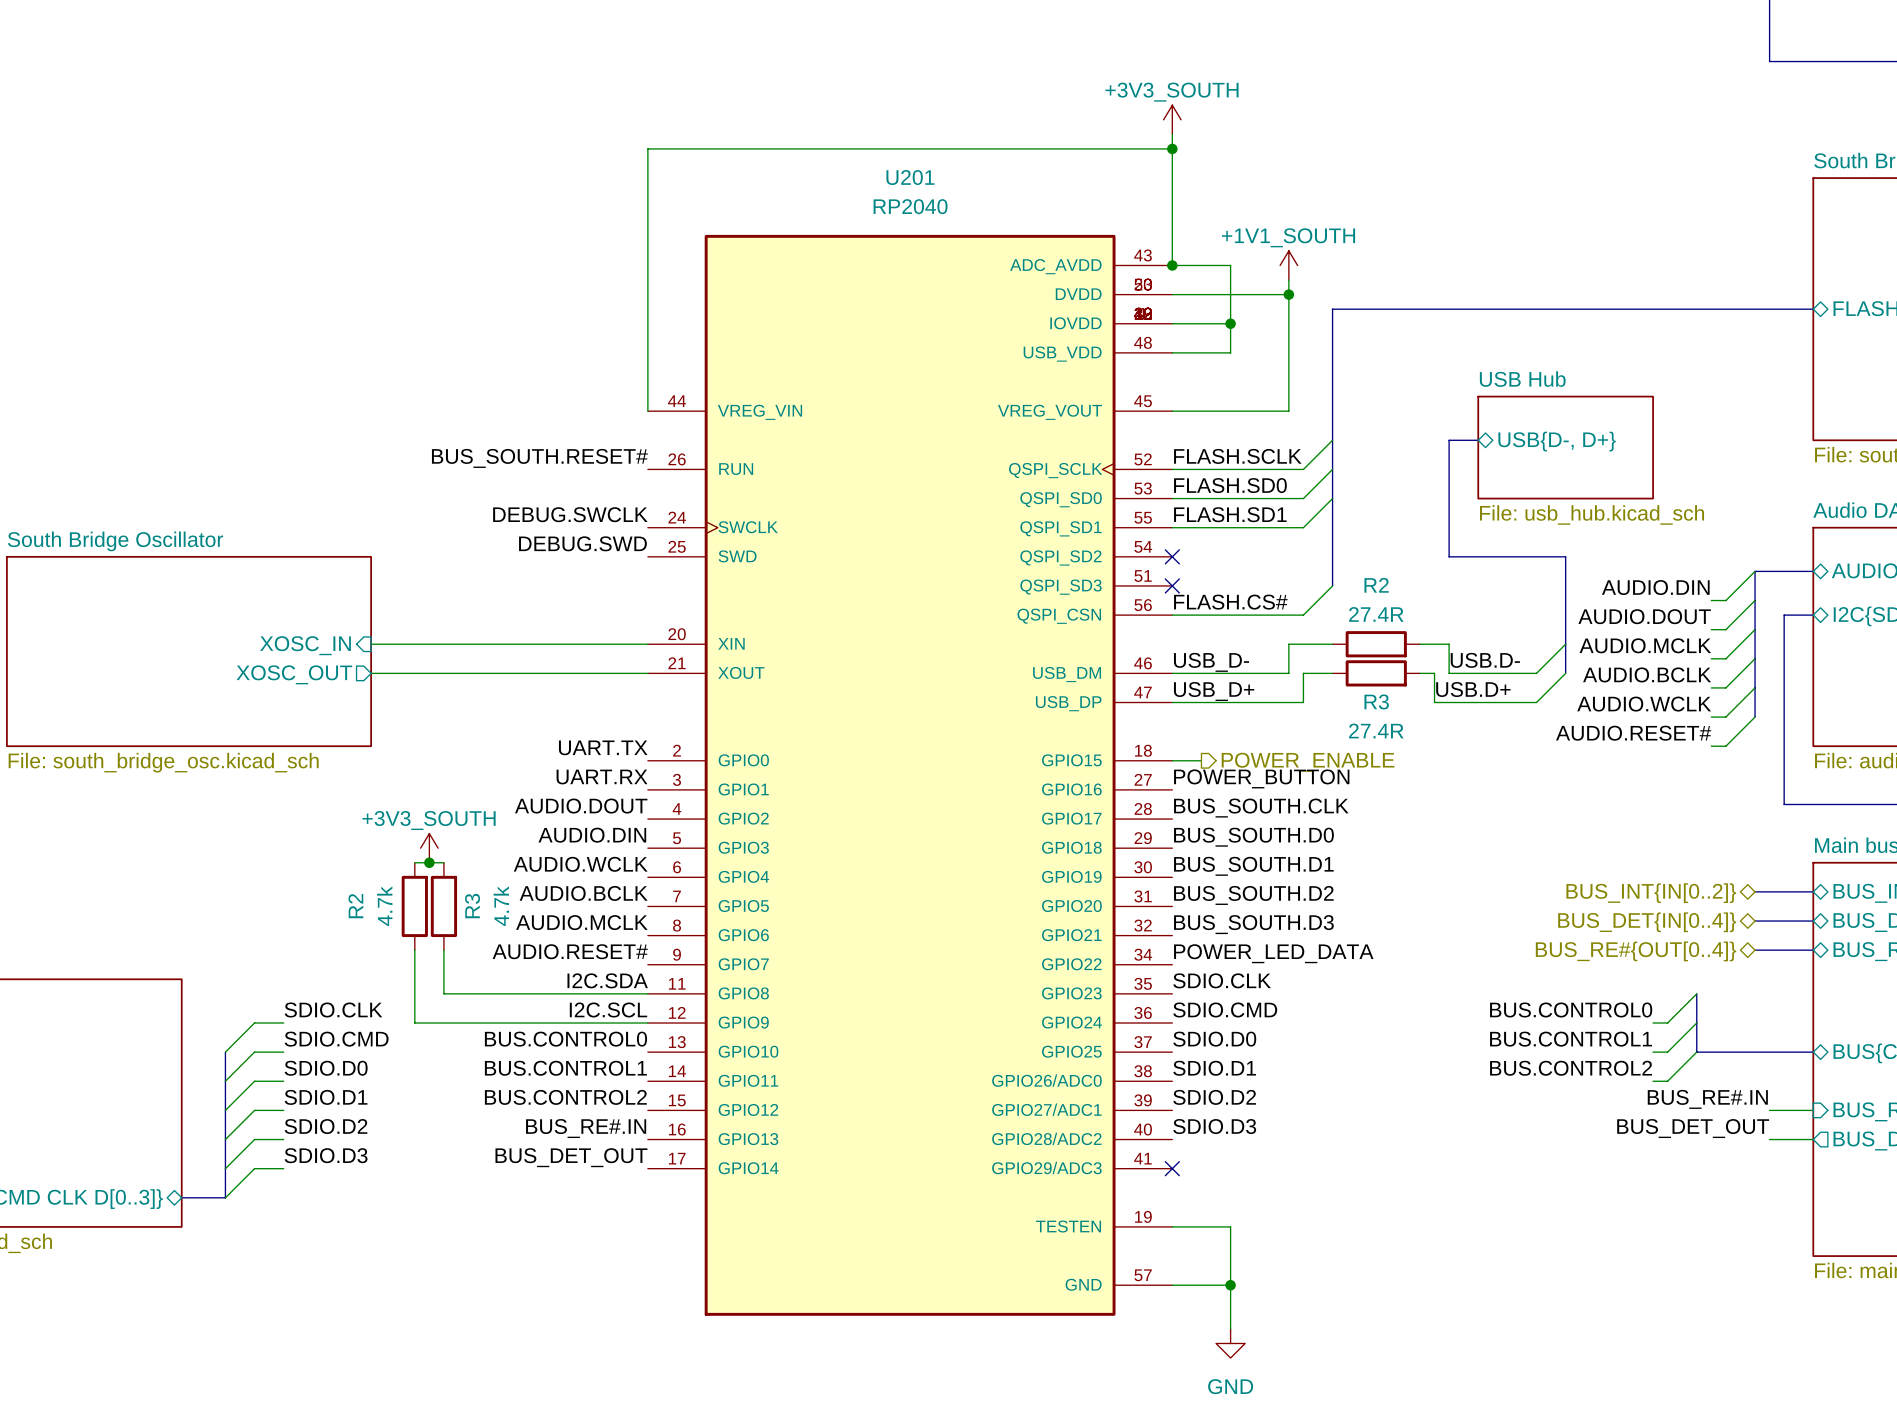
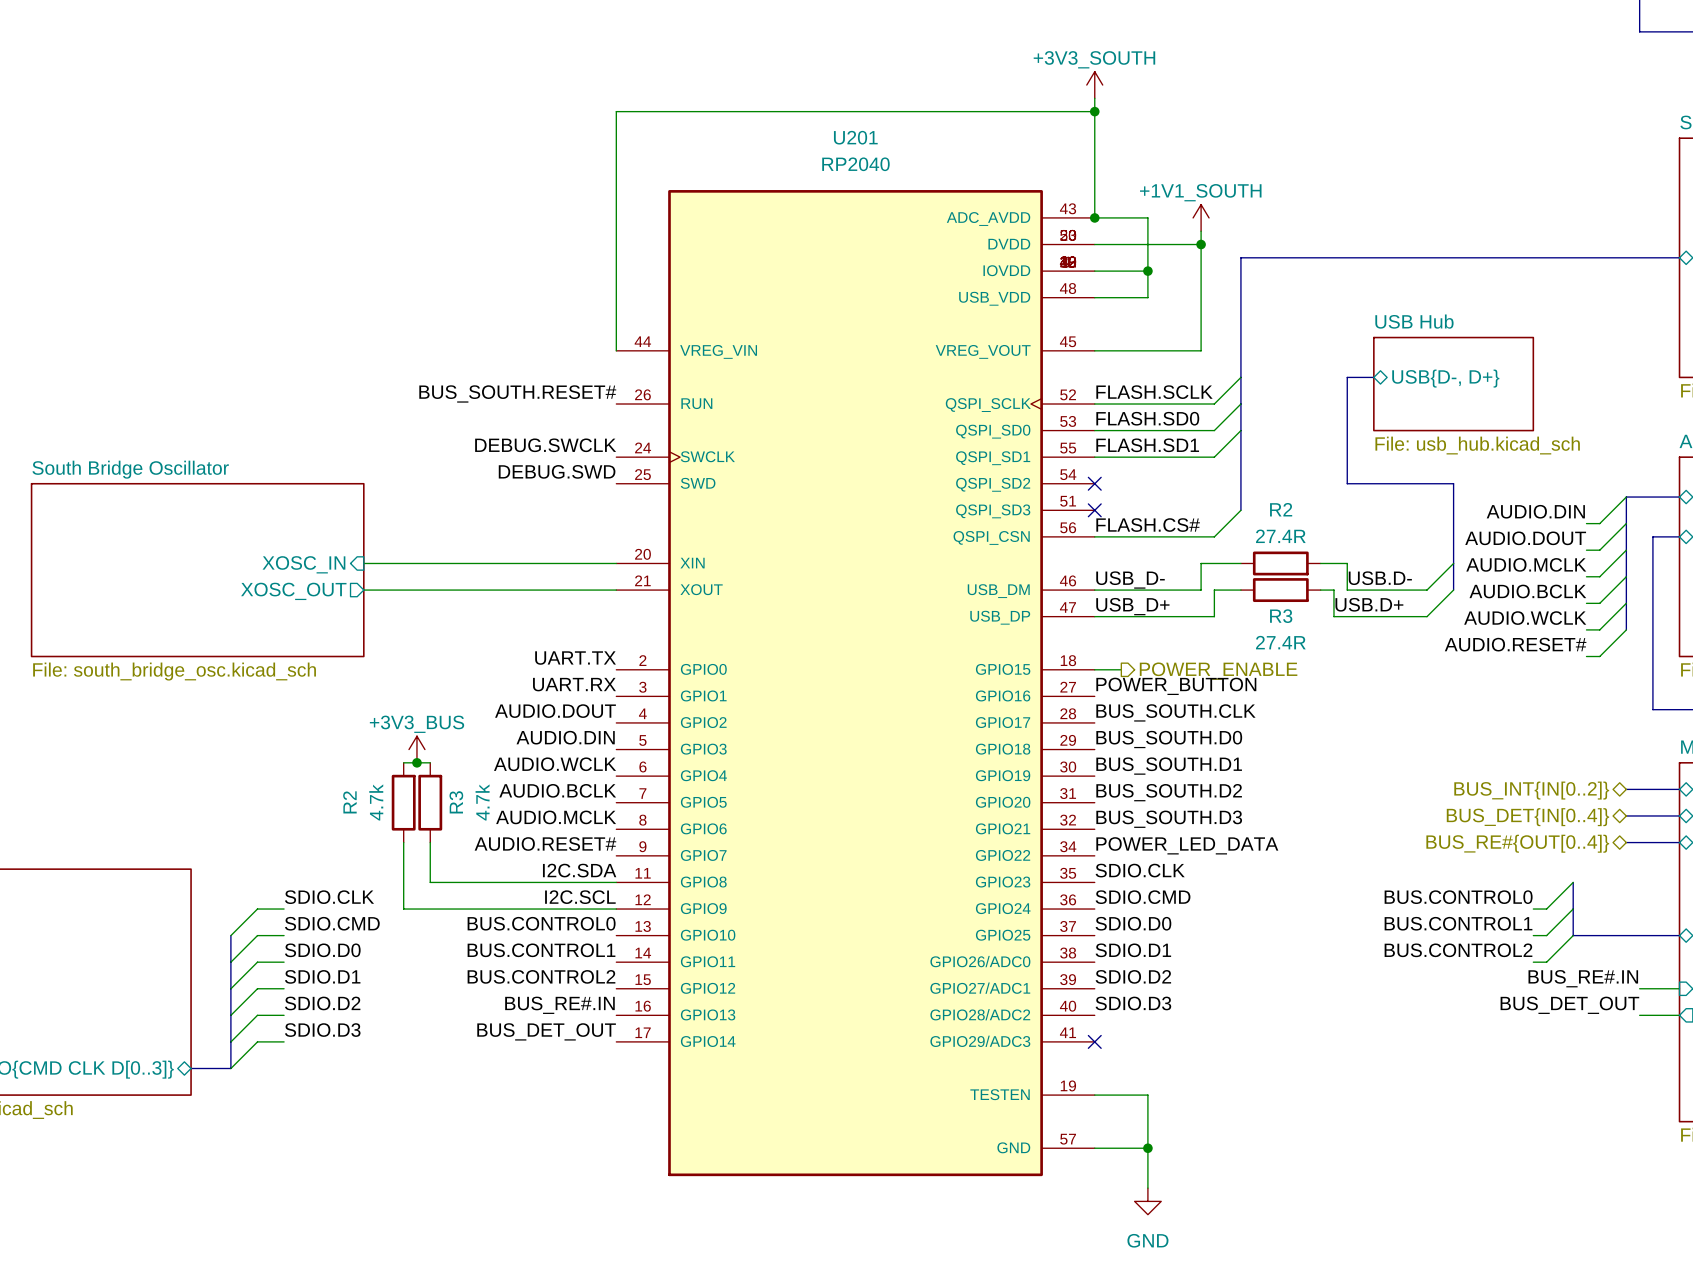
power symbol: +3V3_SOUTH (429, 848) -> +3V3_BUS (416, 749)

